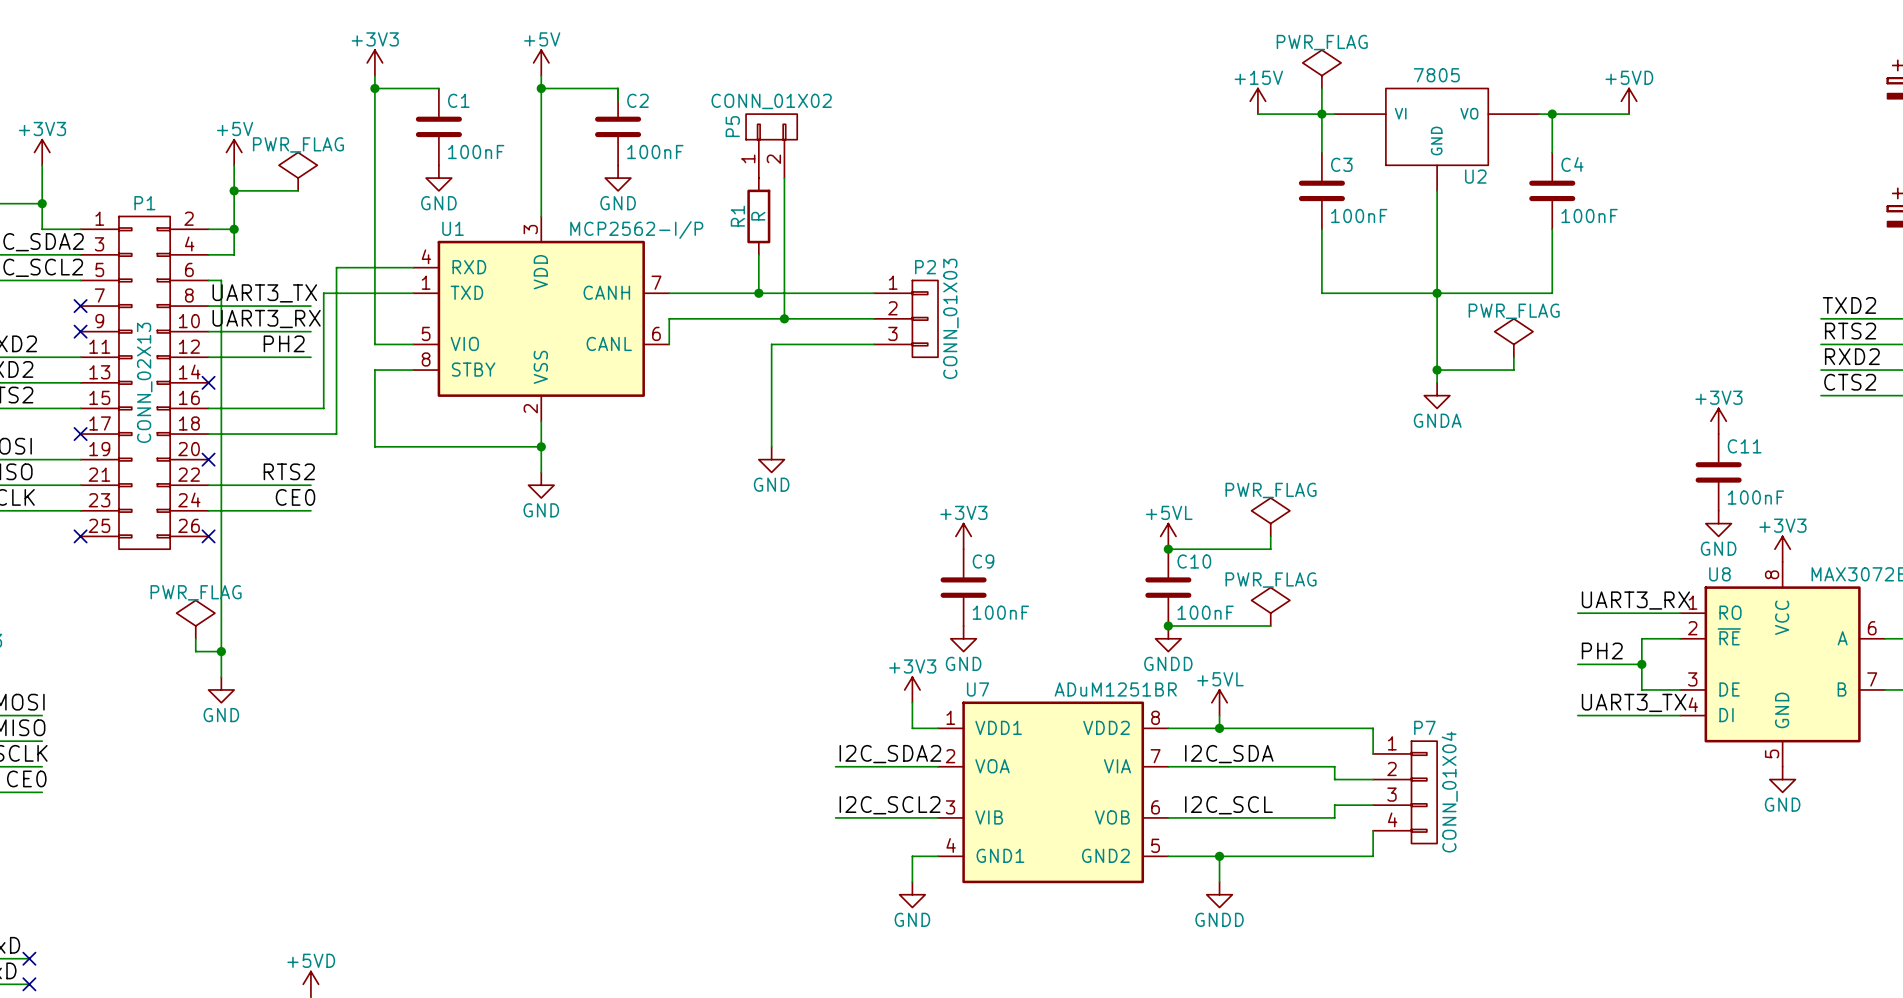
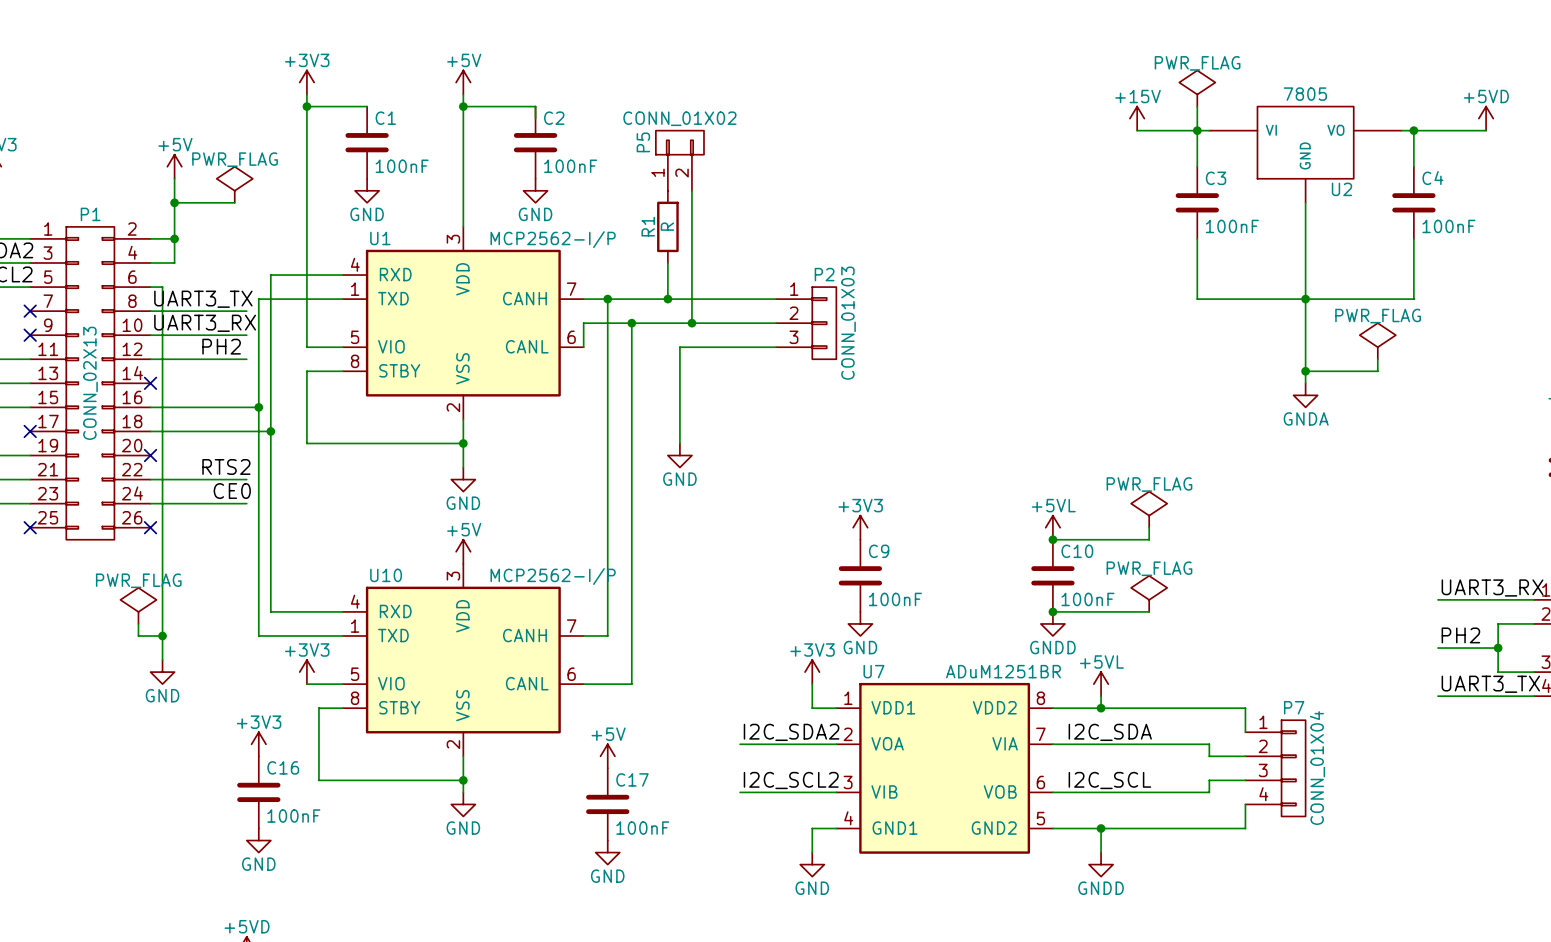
wire: none -> (607, 299) (607, 635) (583, 635)
junction: none -> (607, 299)
wire: none -> (631, 323) (631, 684) (583, 684)
junction: none -> (631, 323)
wire: none -> (258, 407) (258, 635) (343, 635)
junction: none -> (258, 407)
wire: none -> (270, 431) (270, 611) (343, 611)
junction: none -> (270, 431)
power symbol: none -> +5V (463, 551)
U10: none -> MCP2562-I/P (463, 660)
power symbol: none -> +3V3 (306, 672)
wire: none -> (306, 684) (343, 684)
wire: none -> (343, 708) (318, 708) (318, 780) (463, 780)
power symbol: none -> +3V3 (258, 744)
wire: none -> (463, 756) (463, 792)
power symbol: none -> +5V (607, 756)
junction: none -> (463, 780)
C16: none -> 100nF (258, 792)
power symbol: none -> GND (463, 804)
C17: none -> 100nF (607, 804)
power symbol: none -> GND (258, 840)
power symbol: none -> GND (607, 852)

